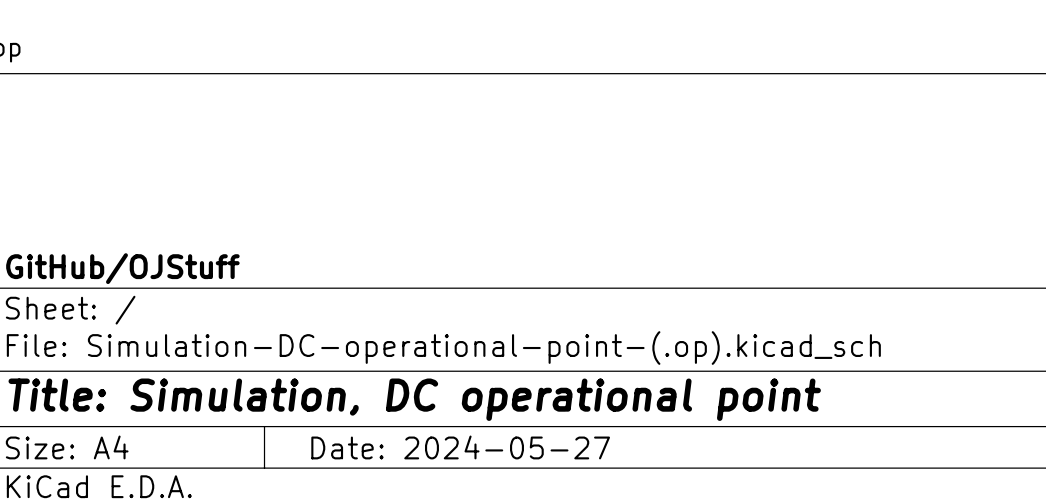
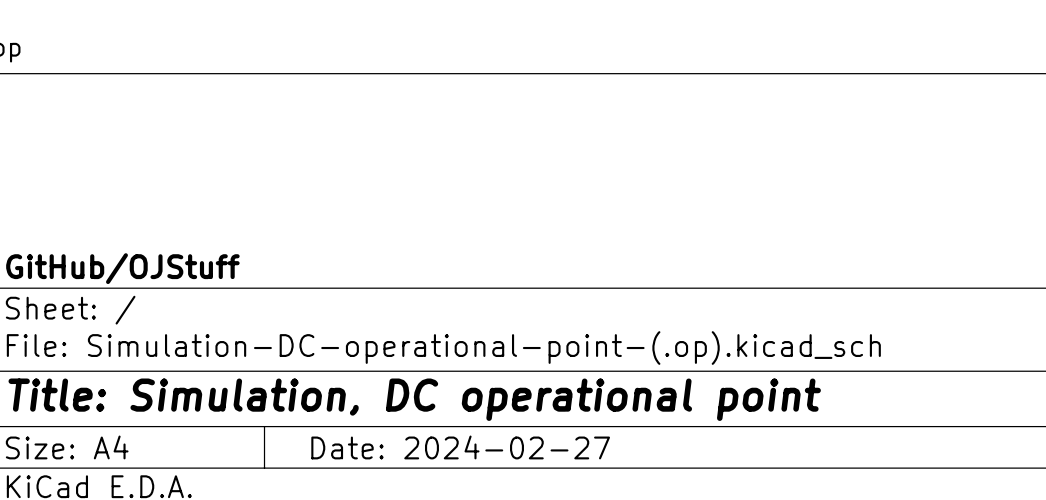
title block: Date: 2024-05-27 (460, 447) -> Date: 2024-02-27 (460, 447)

